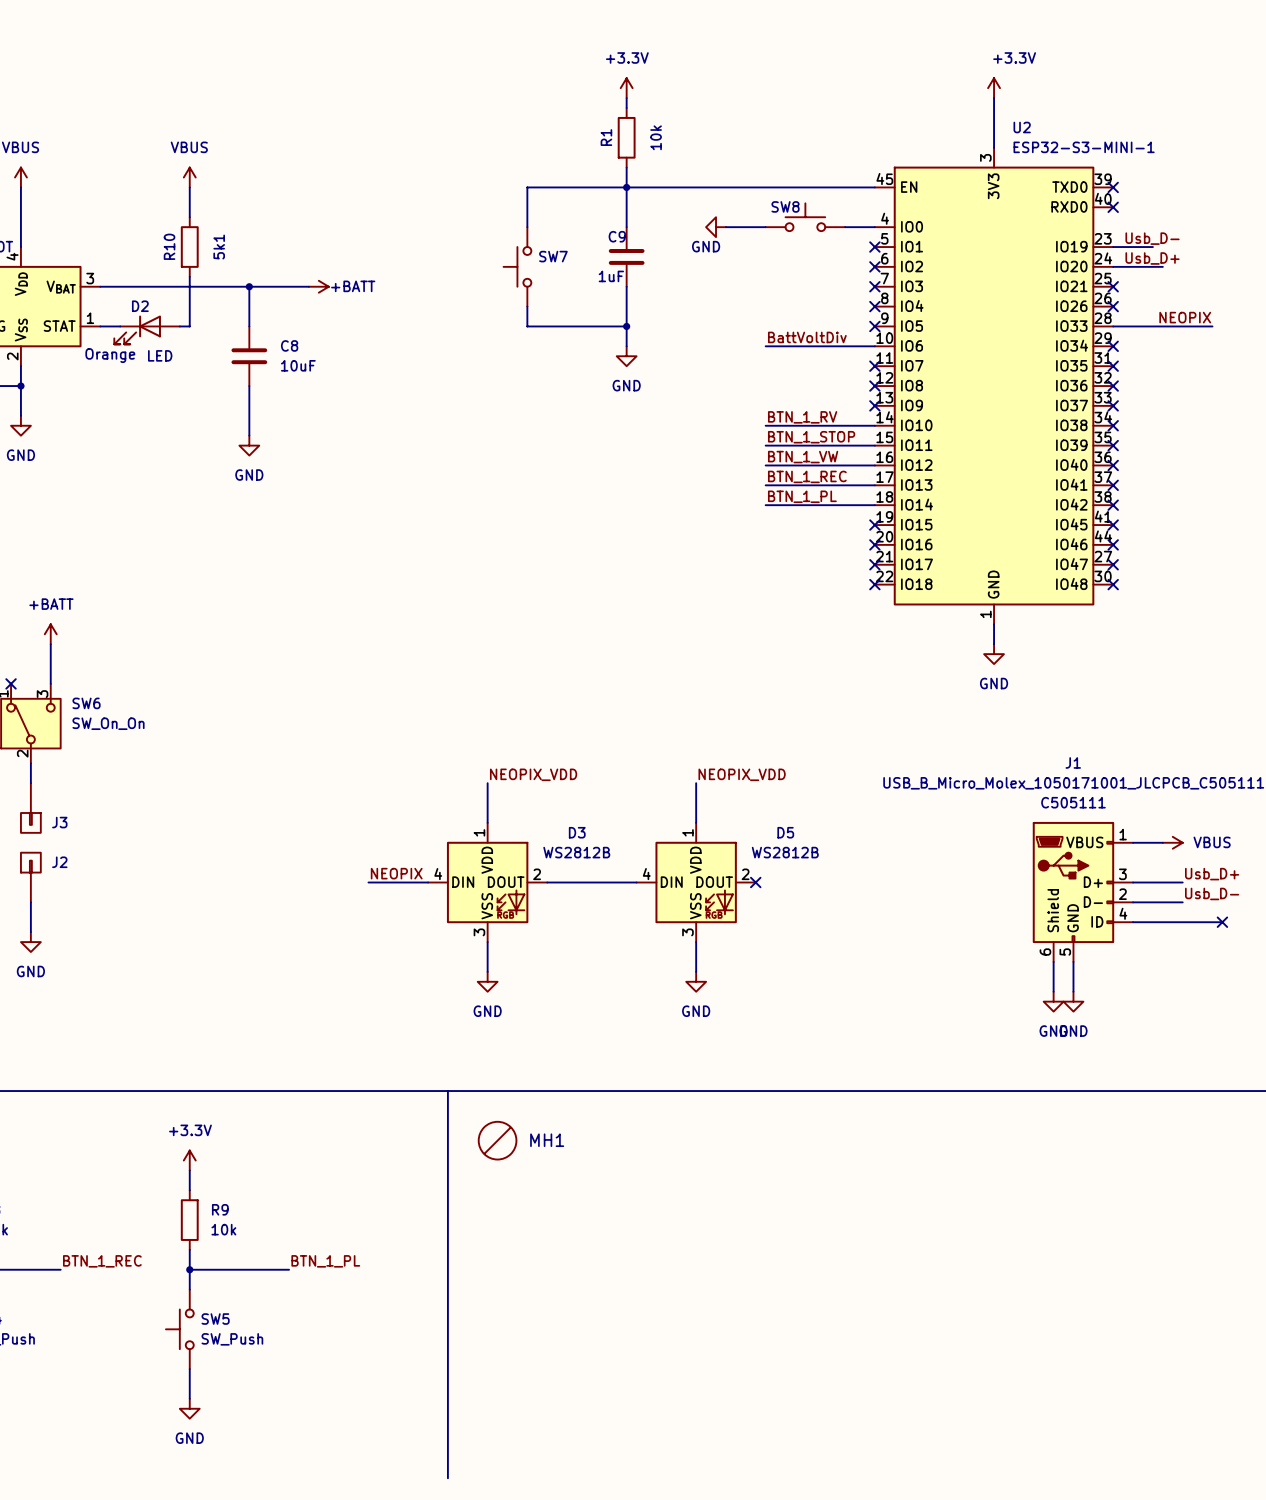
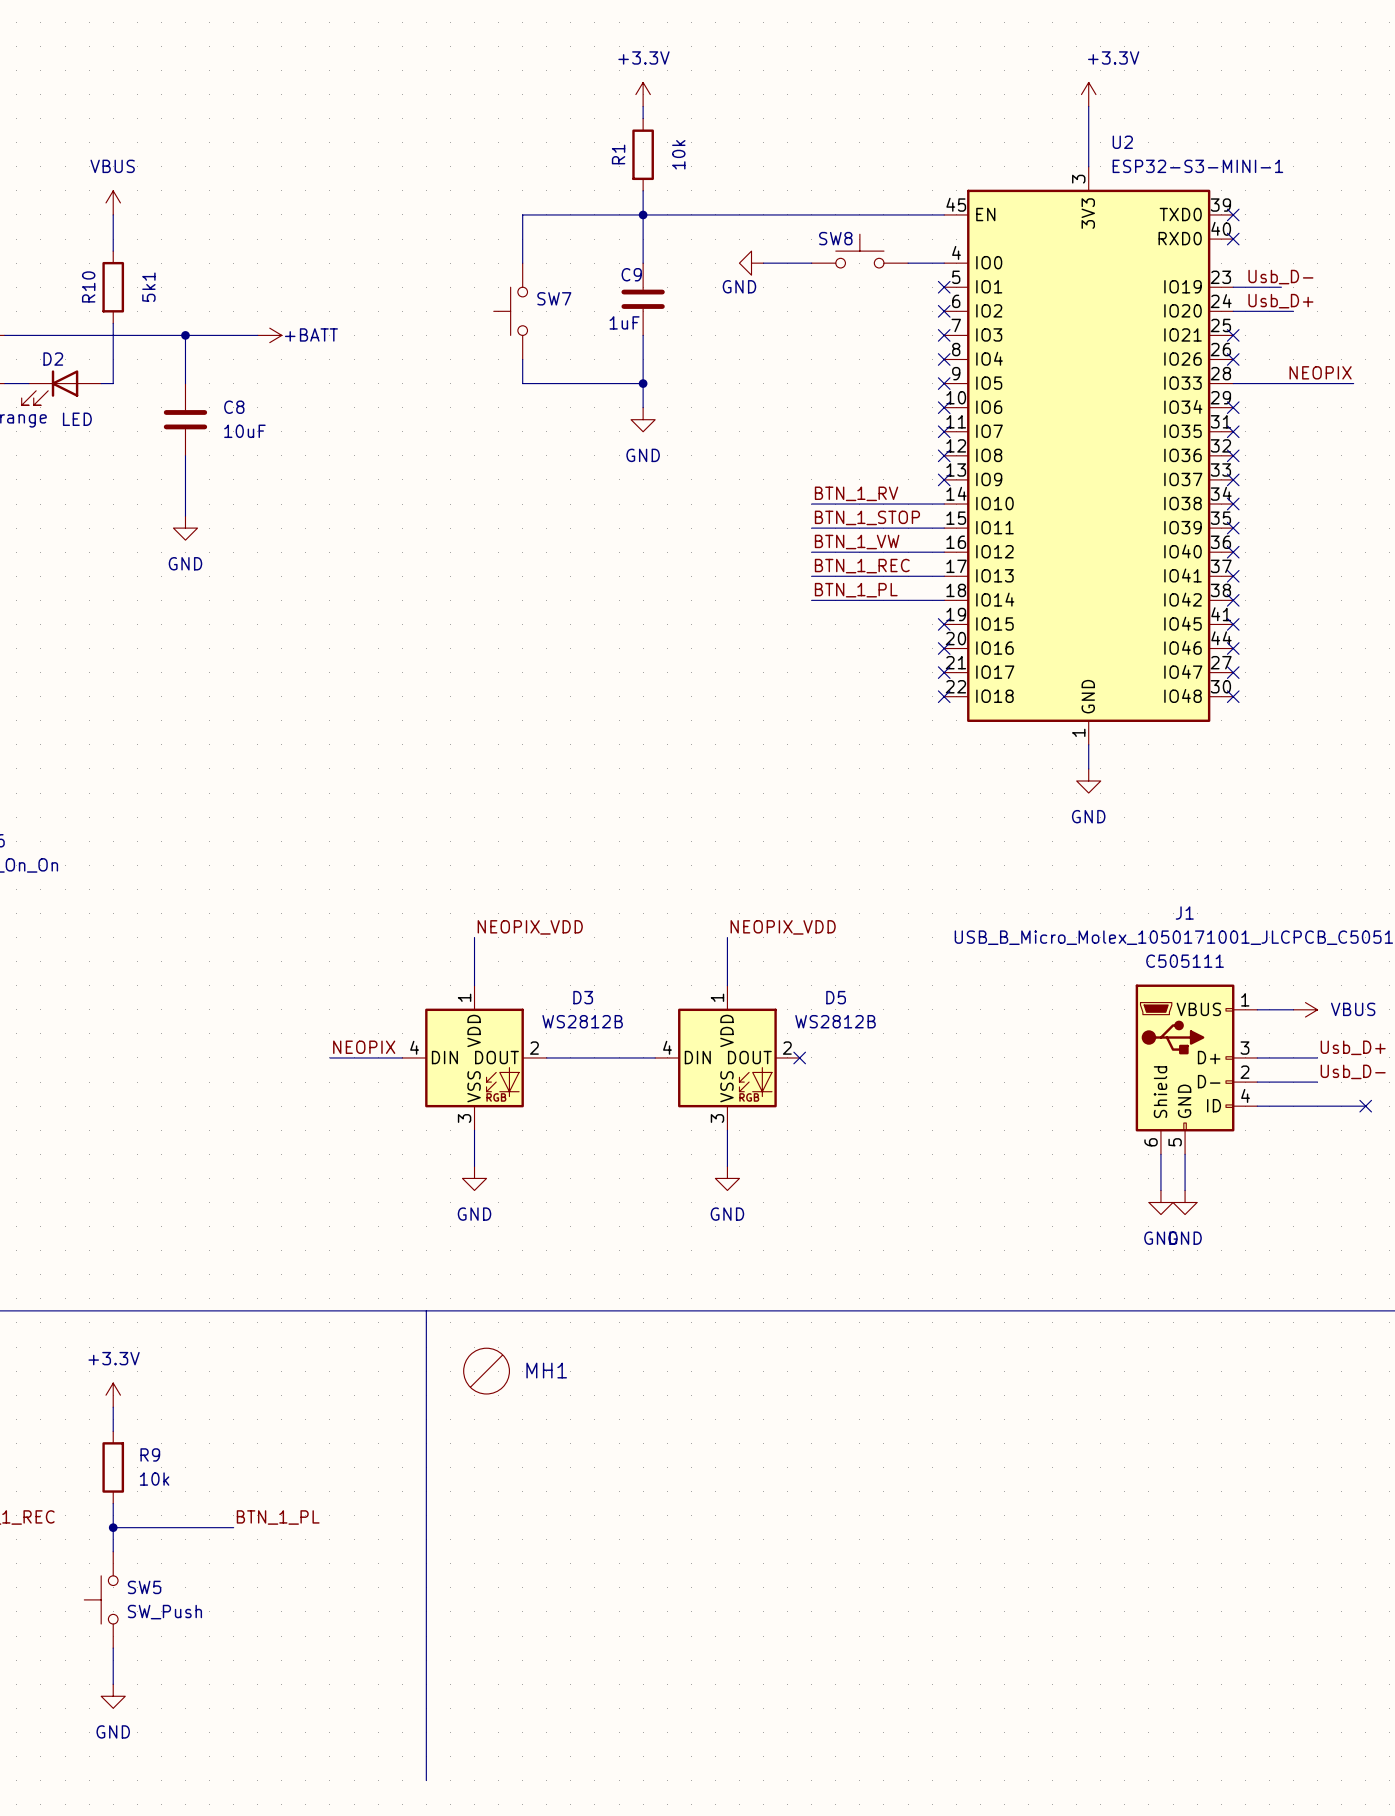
label: BattVoltDiv (807, 337) -> none
wire: (765, 346) (874, 346) -> none
no-connect mark: none -> (944, 407)

